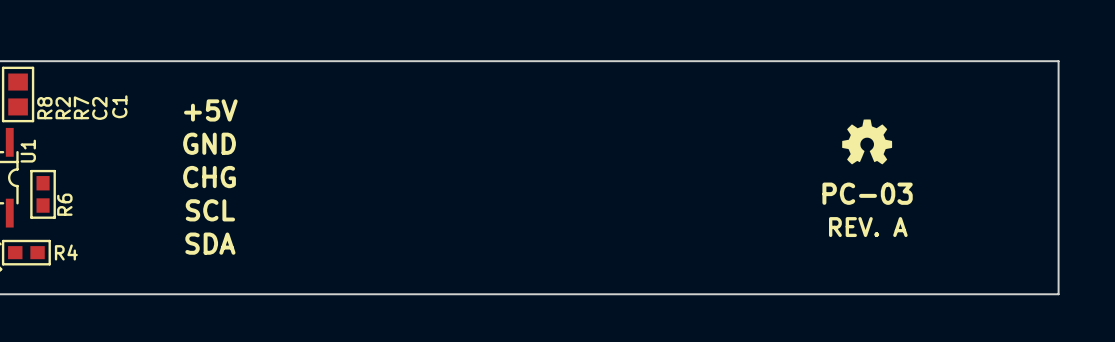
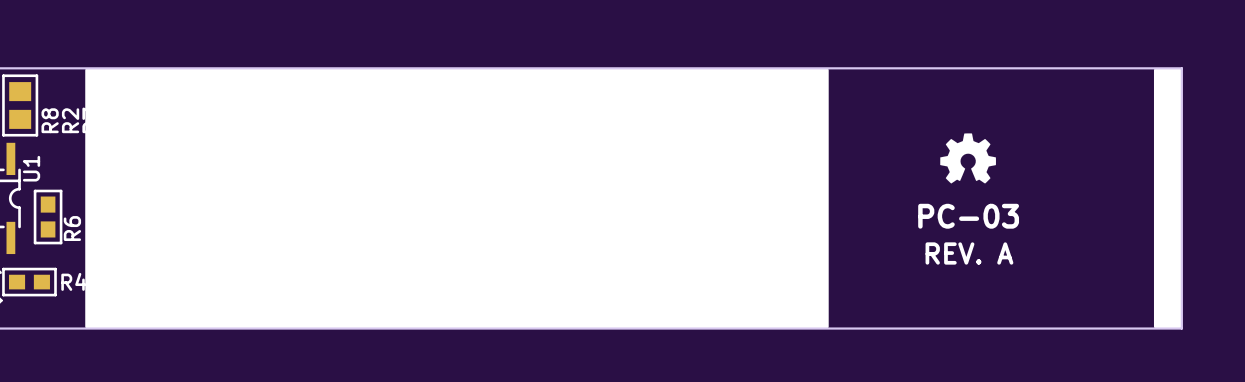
drawing: none -> [85, 68, 829, 329]
drawing: none -> [1153, 68, 1182, 329]

